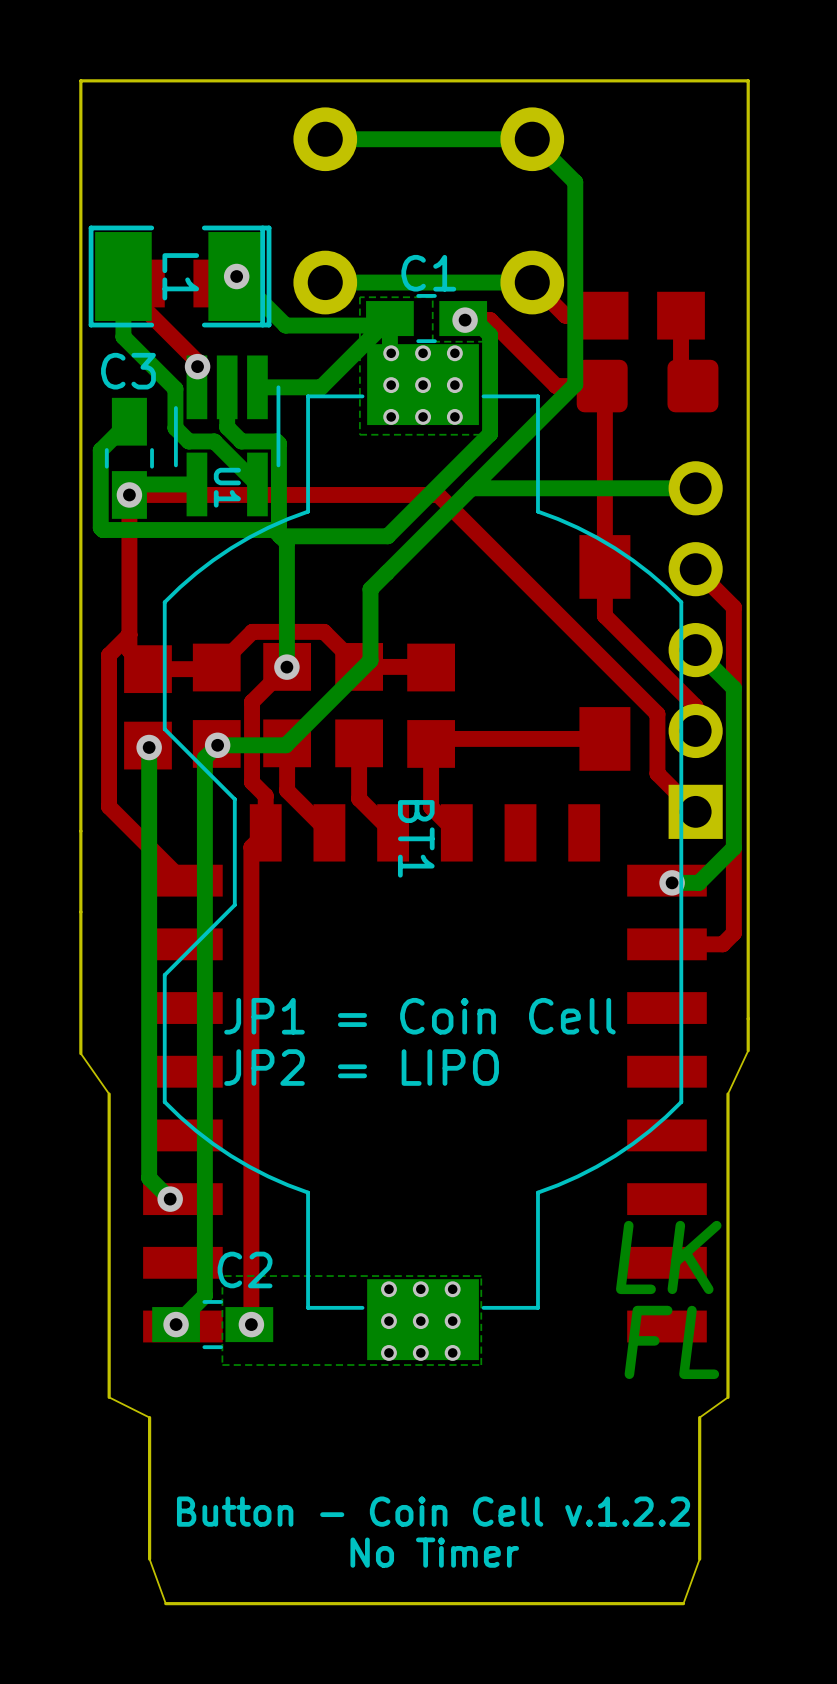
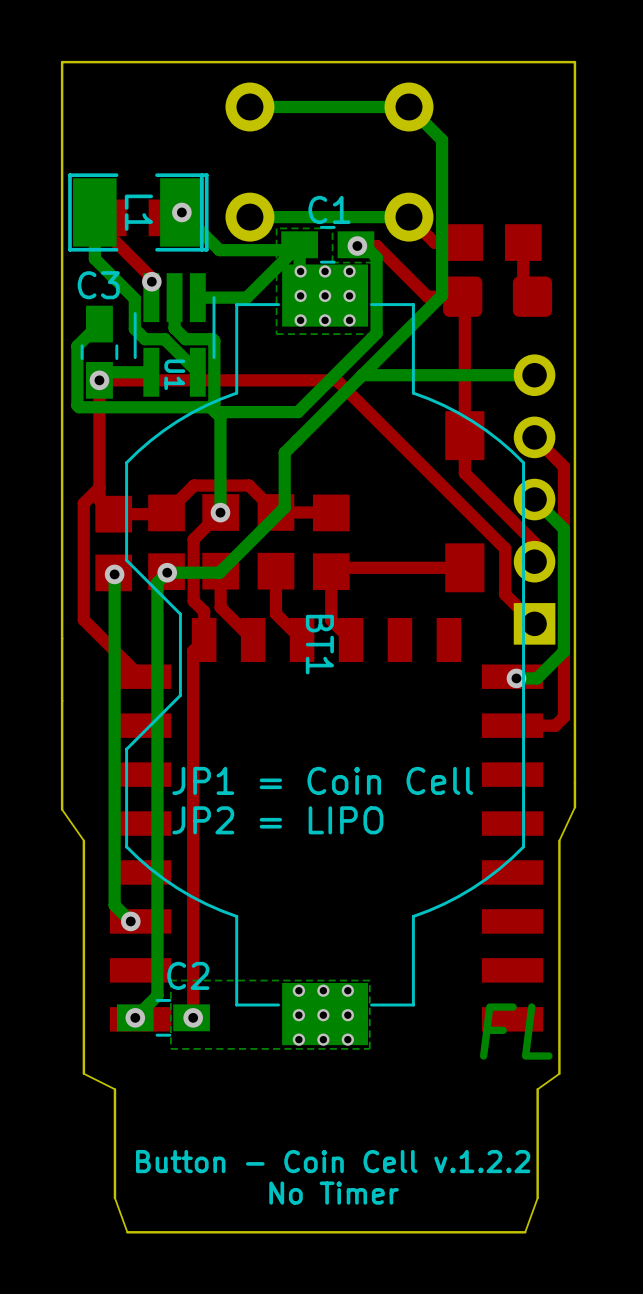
text: LK (668, 1257) -> none

